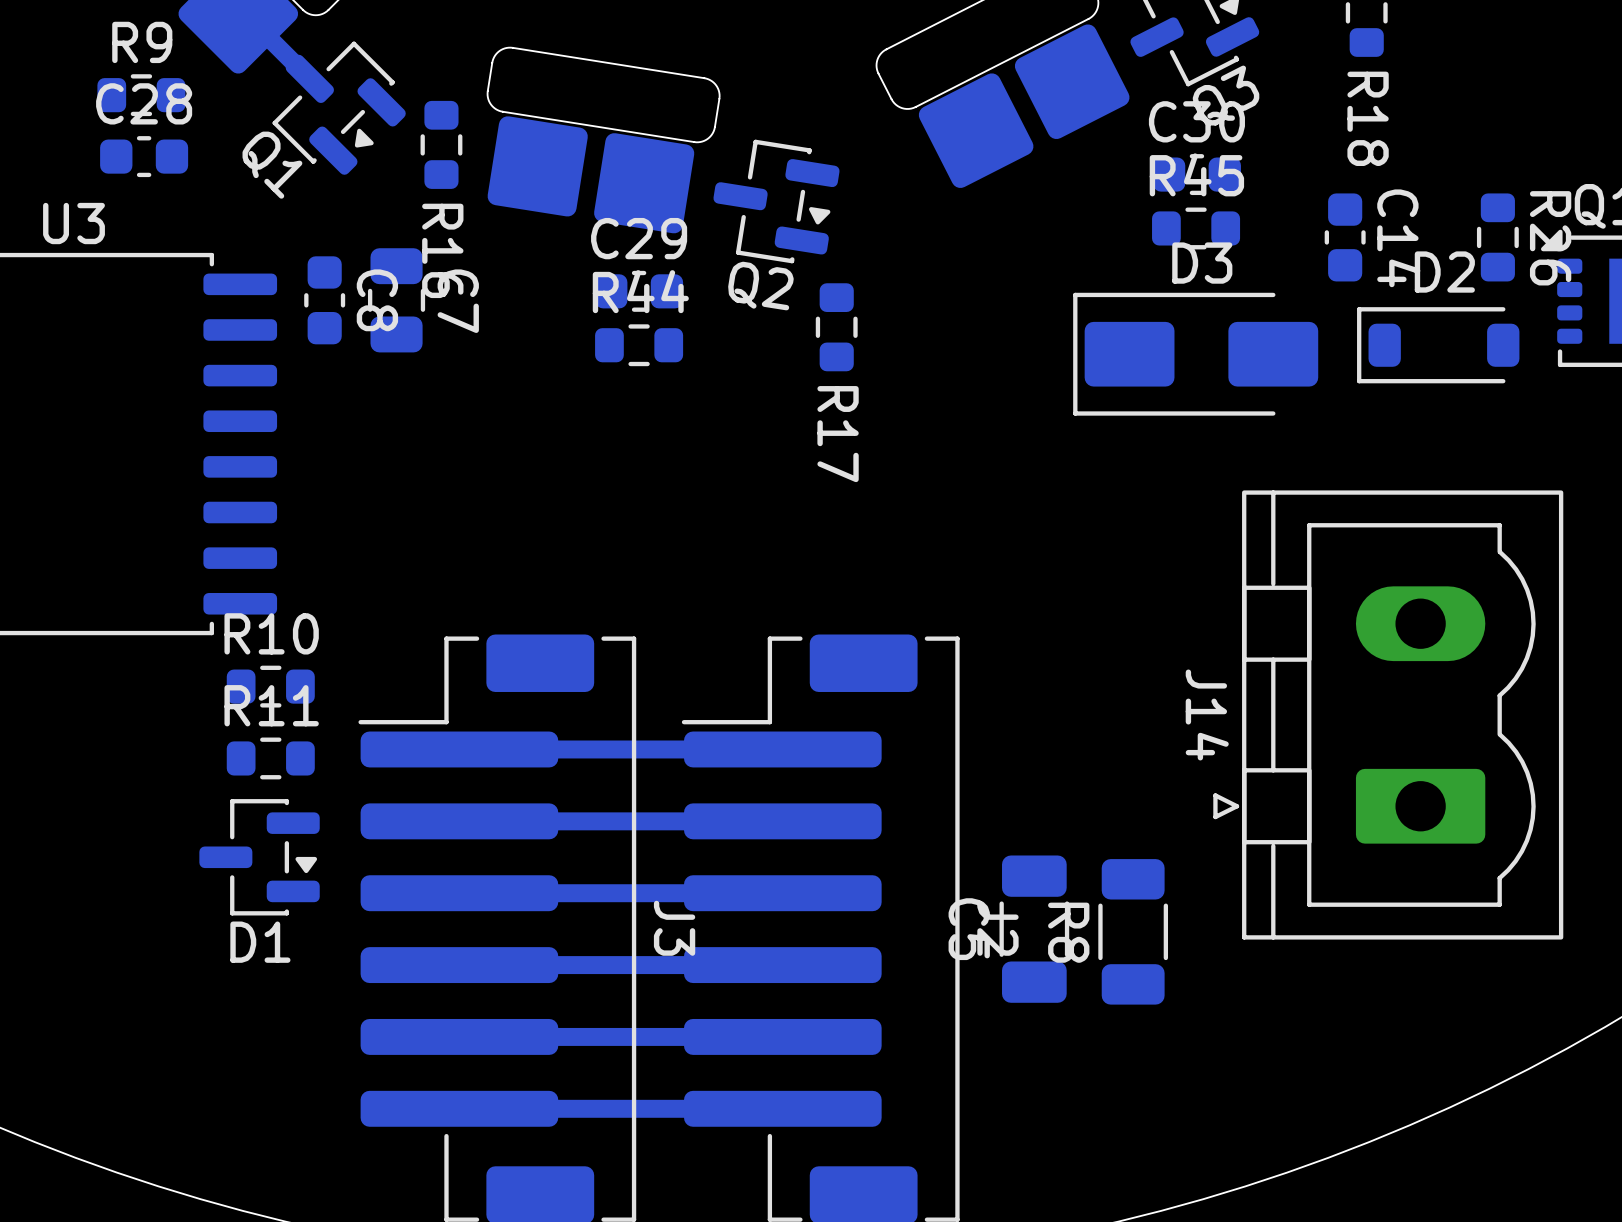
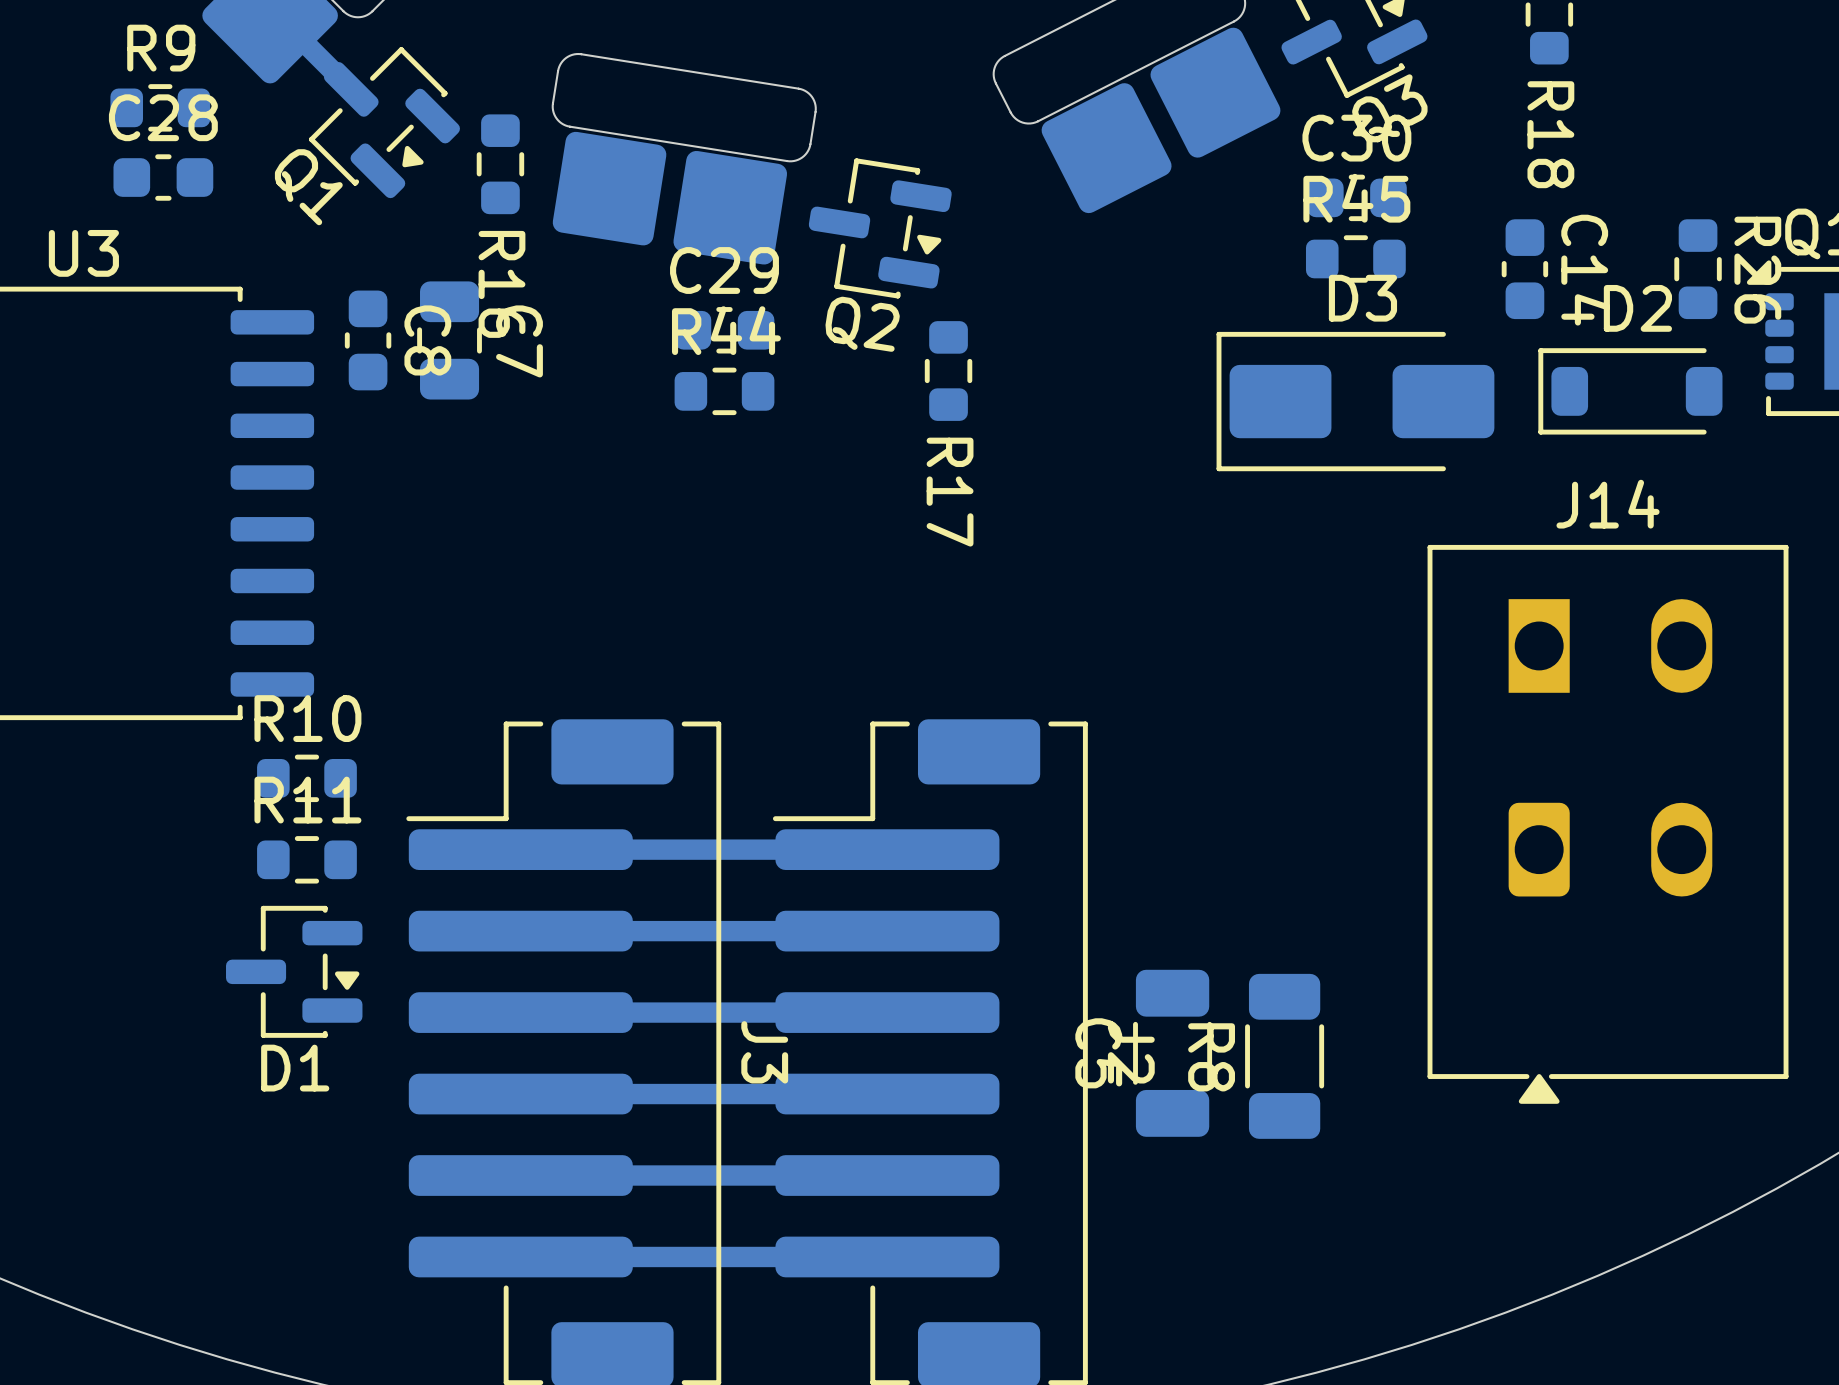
J14 footprint: [1213, 490, 1564, 940] -> [1427, 544, 1789, 1104]
J14 name position: J14 (1207, 714) -> J14 (1608, 504)

